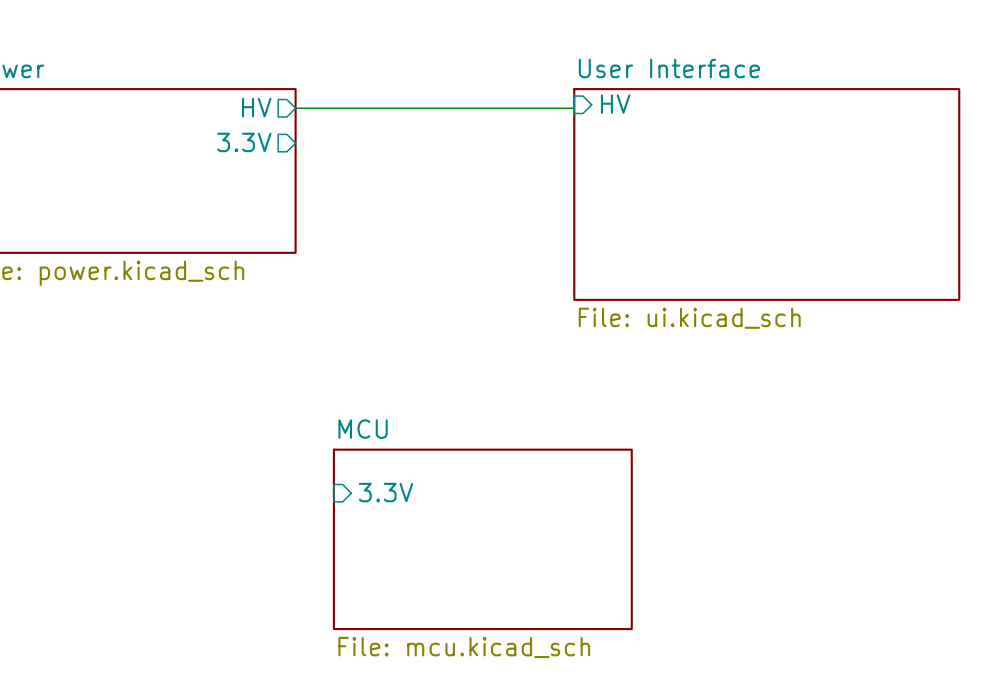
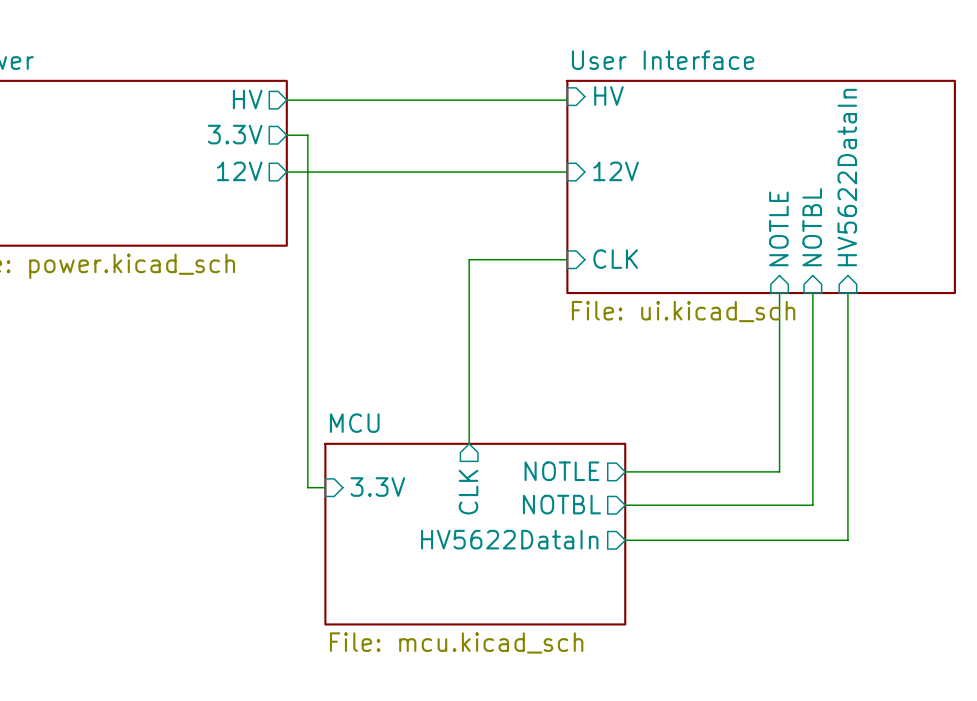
wire: none -> (286, 135) (307, 135) (307, 487) (325, 487)
sheet pin: none -> 12V (239, 171)
wire: none -> (286, 172) (567, 172)
sheet pin: none -> 12V (616, 171)
sheet pin: none -> HV5622DataIn (847, 177)
sheet pin: none -> NOTBL (812, 227)
sheet pin: none -> NOTLE (778, 228)
wire: none -> (567, 259) (469, 259) (469, 443)
sheet pin: none -> CLK (615, 259)
wire: none -> (779, 293) (779, 471) (625, 471)
wire: none -> (812, 293) (812, 505) (625, 505)
wire: none -> (847, 293) (847, 540) (625, 540)
sheet pin: none -> NOTLE (561, 471)
sheet pin: none -> CLK (468, 492)
sheet pin: none -> NOTBL (561, 504)
sheet pin: none -> HV5622DataIn (509, 539)

